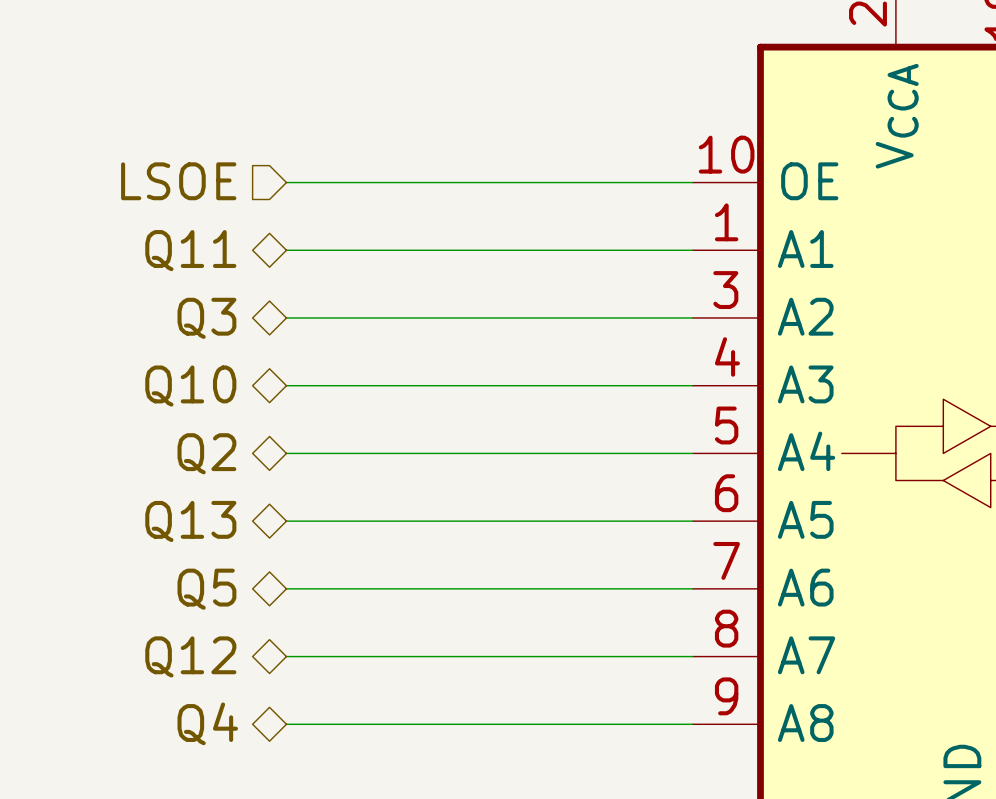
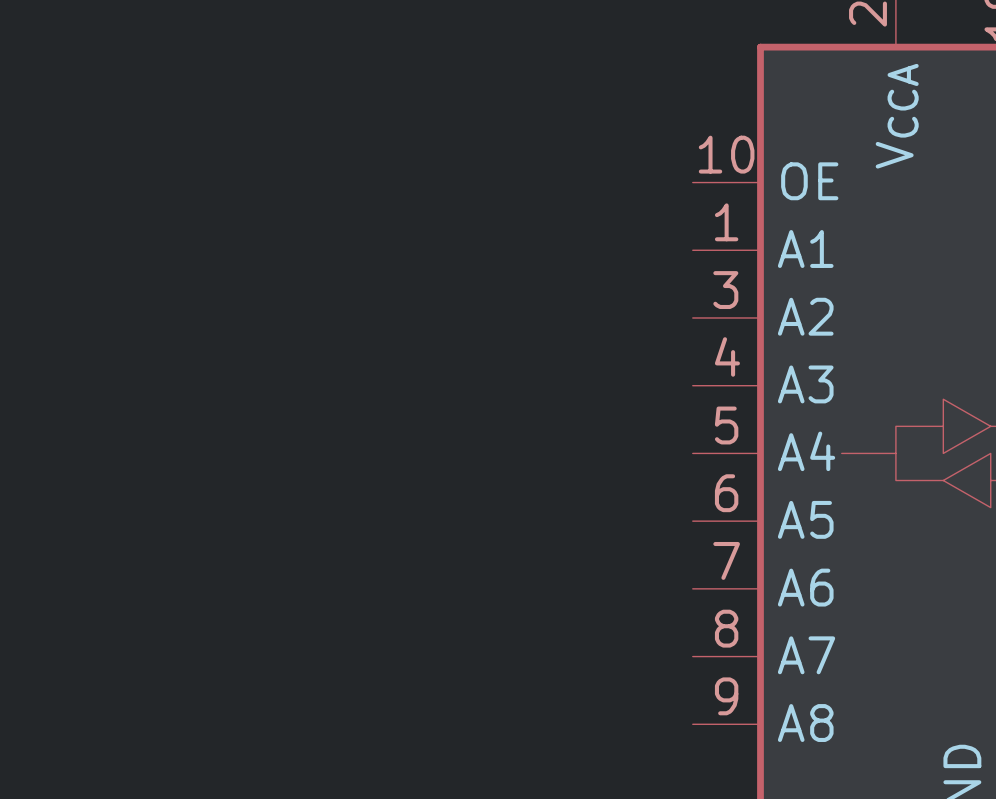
hierarchical label: LSOE (178, 181) -> none
wire: (286, 182) (692, 182) -> none
hierarchical label: Q11 (190, 250) -> none
wire: (286, 250) (692, 250) -> none
wire: (286, 317) (692, 317) -> none
hierarchical label: Q3 (206, 318) -> none
wire: (286, 385) (692, 385) -> none
hierarchical label: Q10 (190, 386) -> none
hierarchical label: Q2 (206, 453) -> none
wire: (286, 453) (692, 453) -> none
hierarchical label: Q13 (190, 521) -> none
wire: (286, 521) (692, 521) -> none
wire: (286, 588) (692, 588) -> none
hierarchical label: Q5 (206, 589) -> none
hierarchical label: Q12 (190, 656) -> none
wire: (286, 656) (692, 656) -> none
hierarchical label: Q4 (207, 723) -> none
wire: (286, 724) (692, 724) -> none

